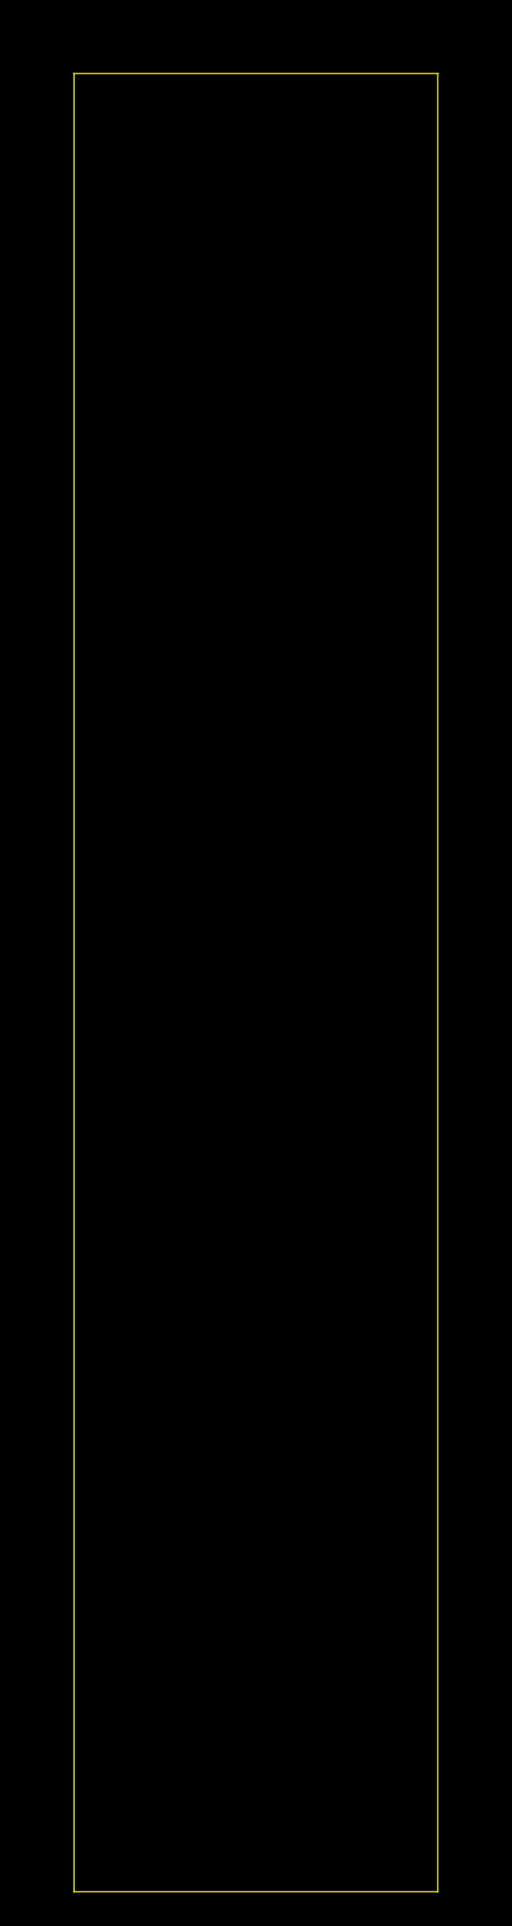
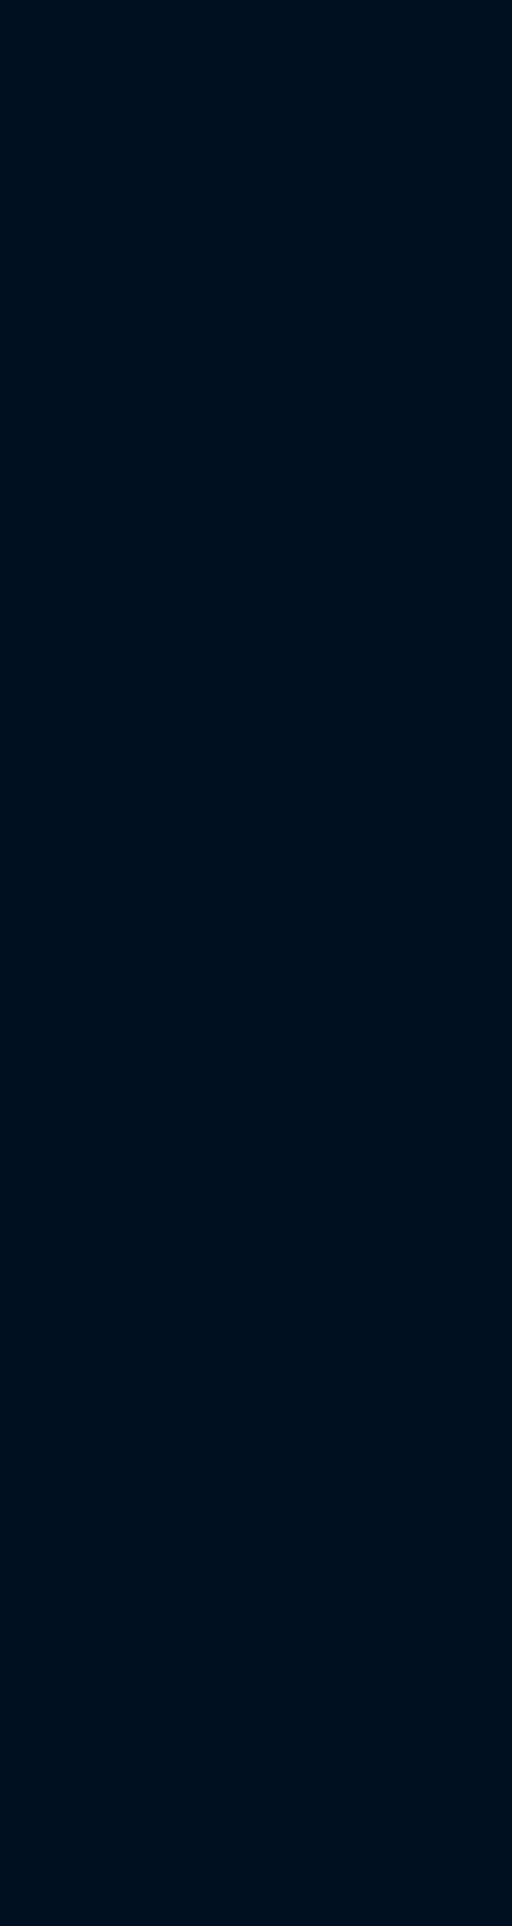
board edge: (437, 73) (74, 73) (74, 1891) (437, 1891) (437, 73) -> none

